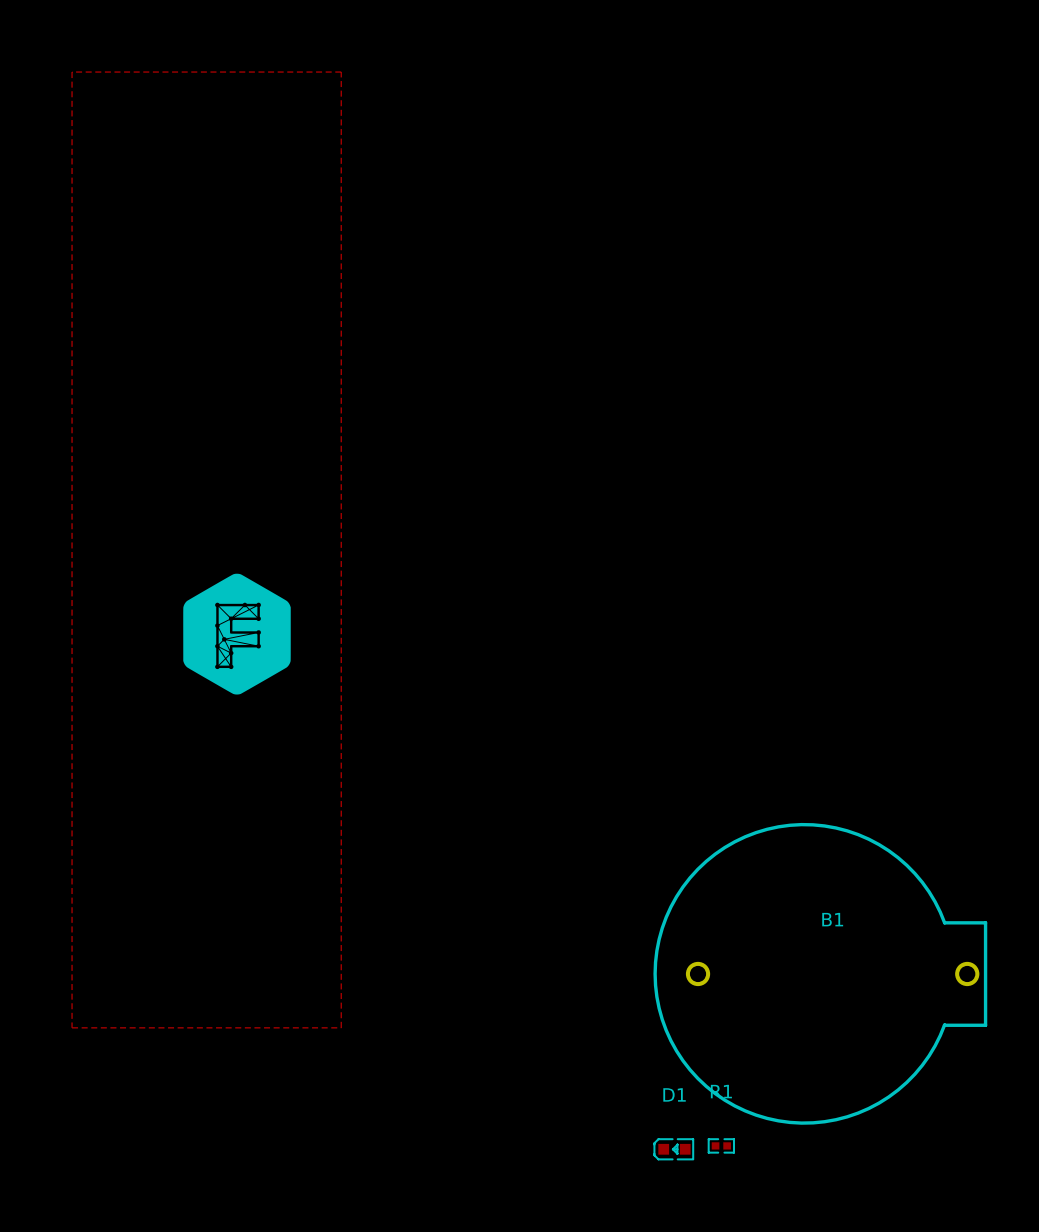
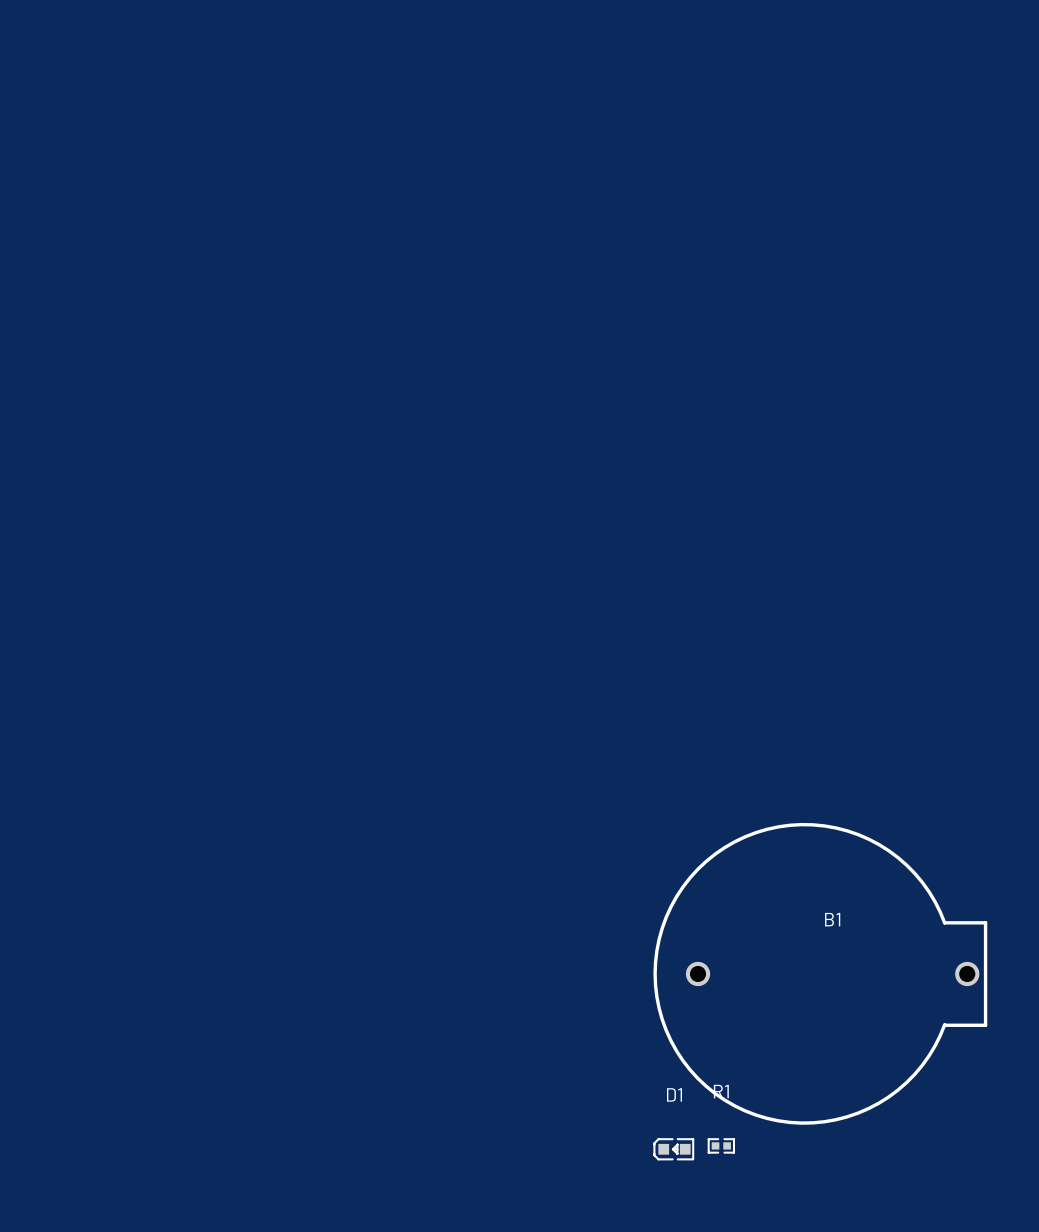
zone outline: (72, 72) (341, 72) (341, 1027) (72, 1027) (72, 72) -> none
drawing: [183, 573, 291, 695] -> none

